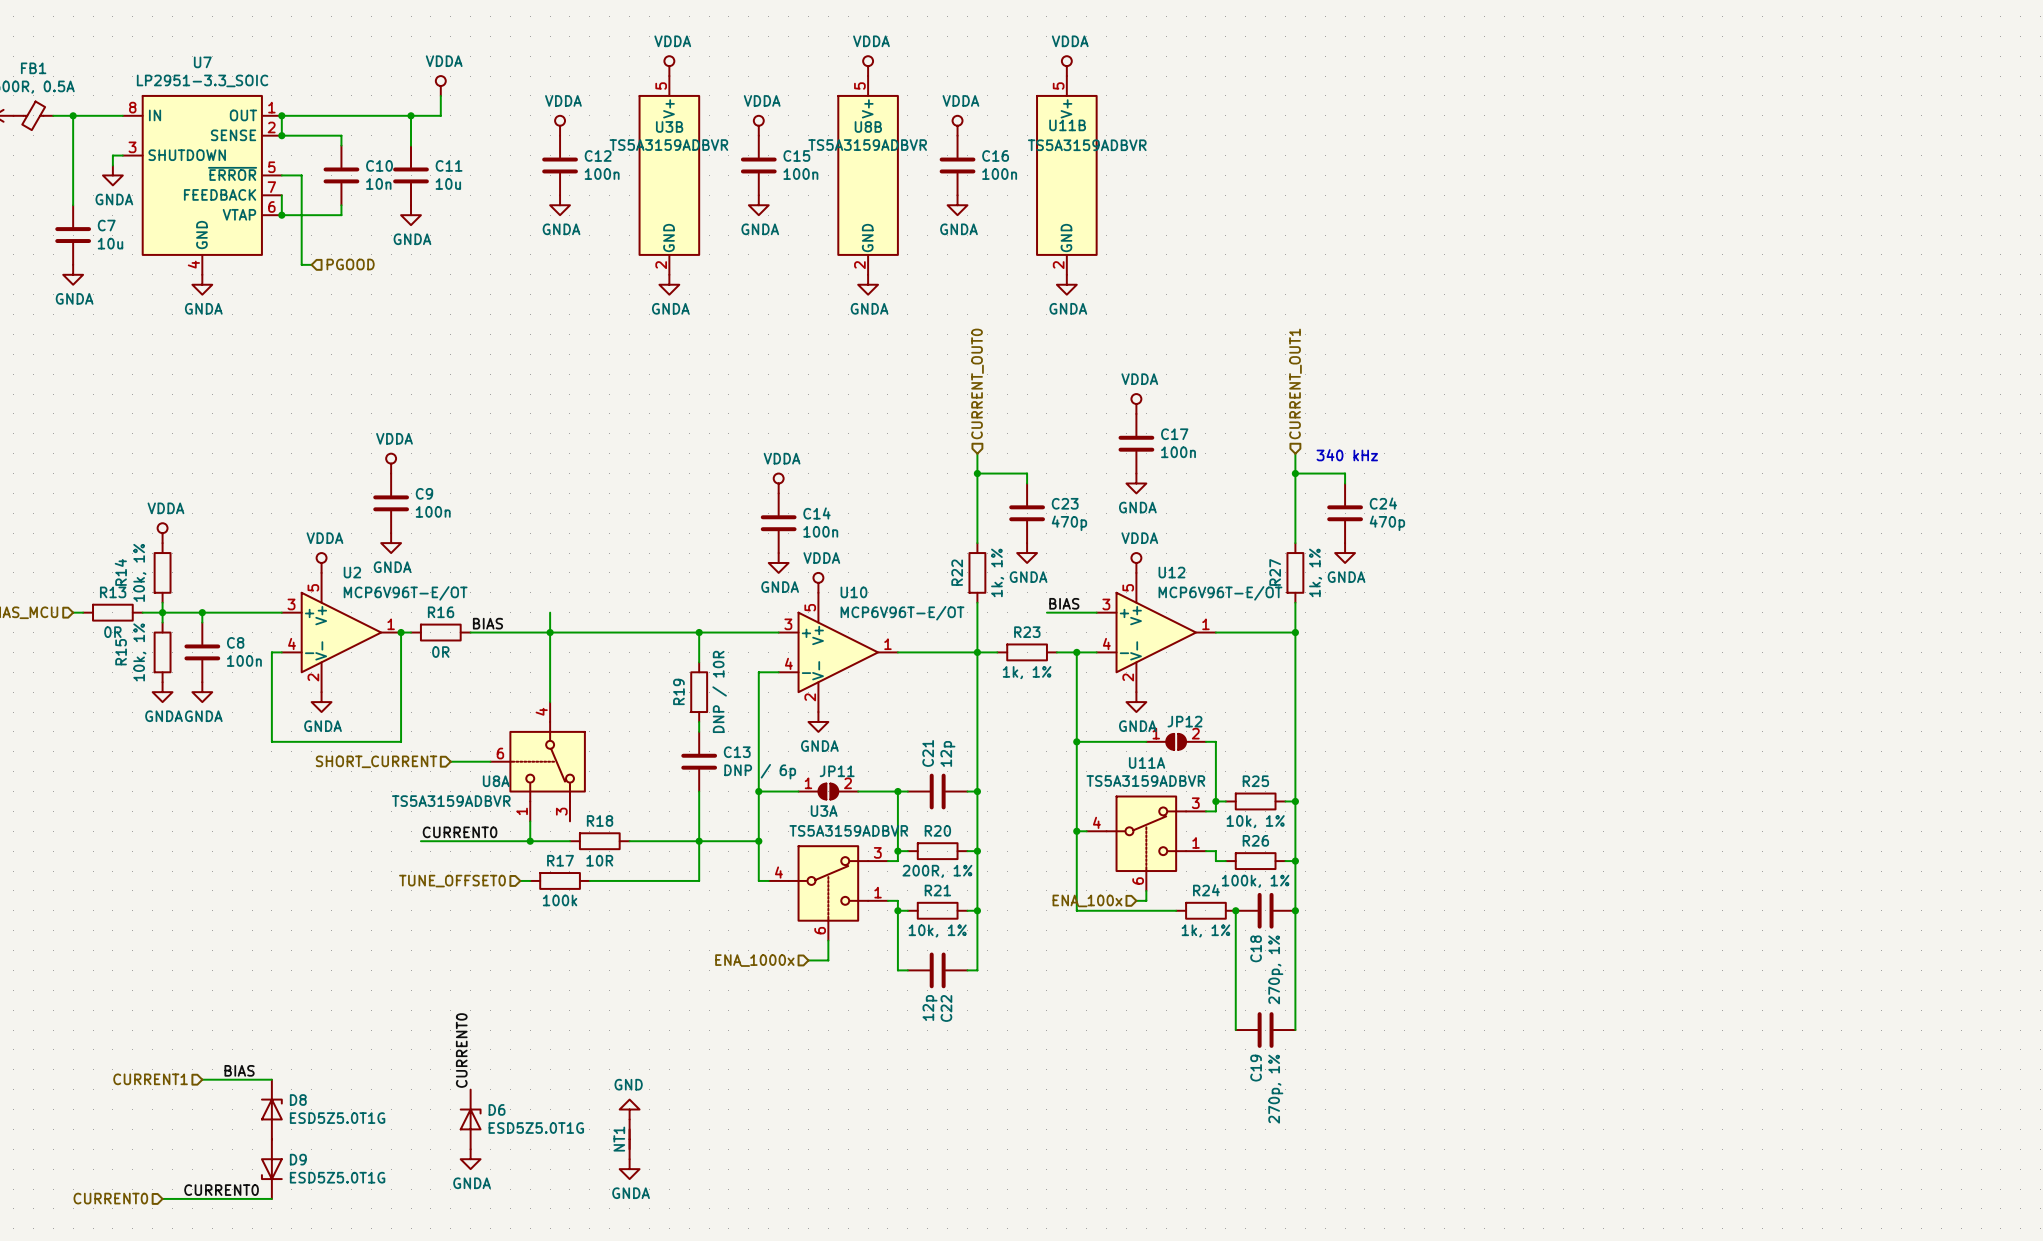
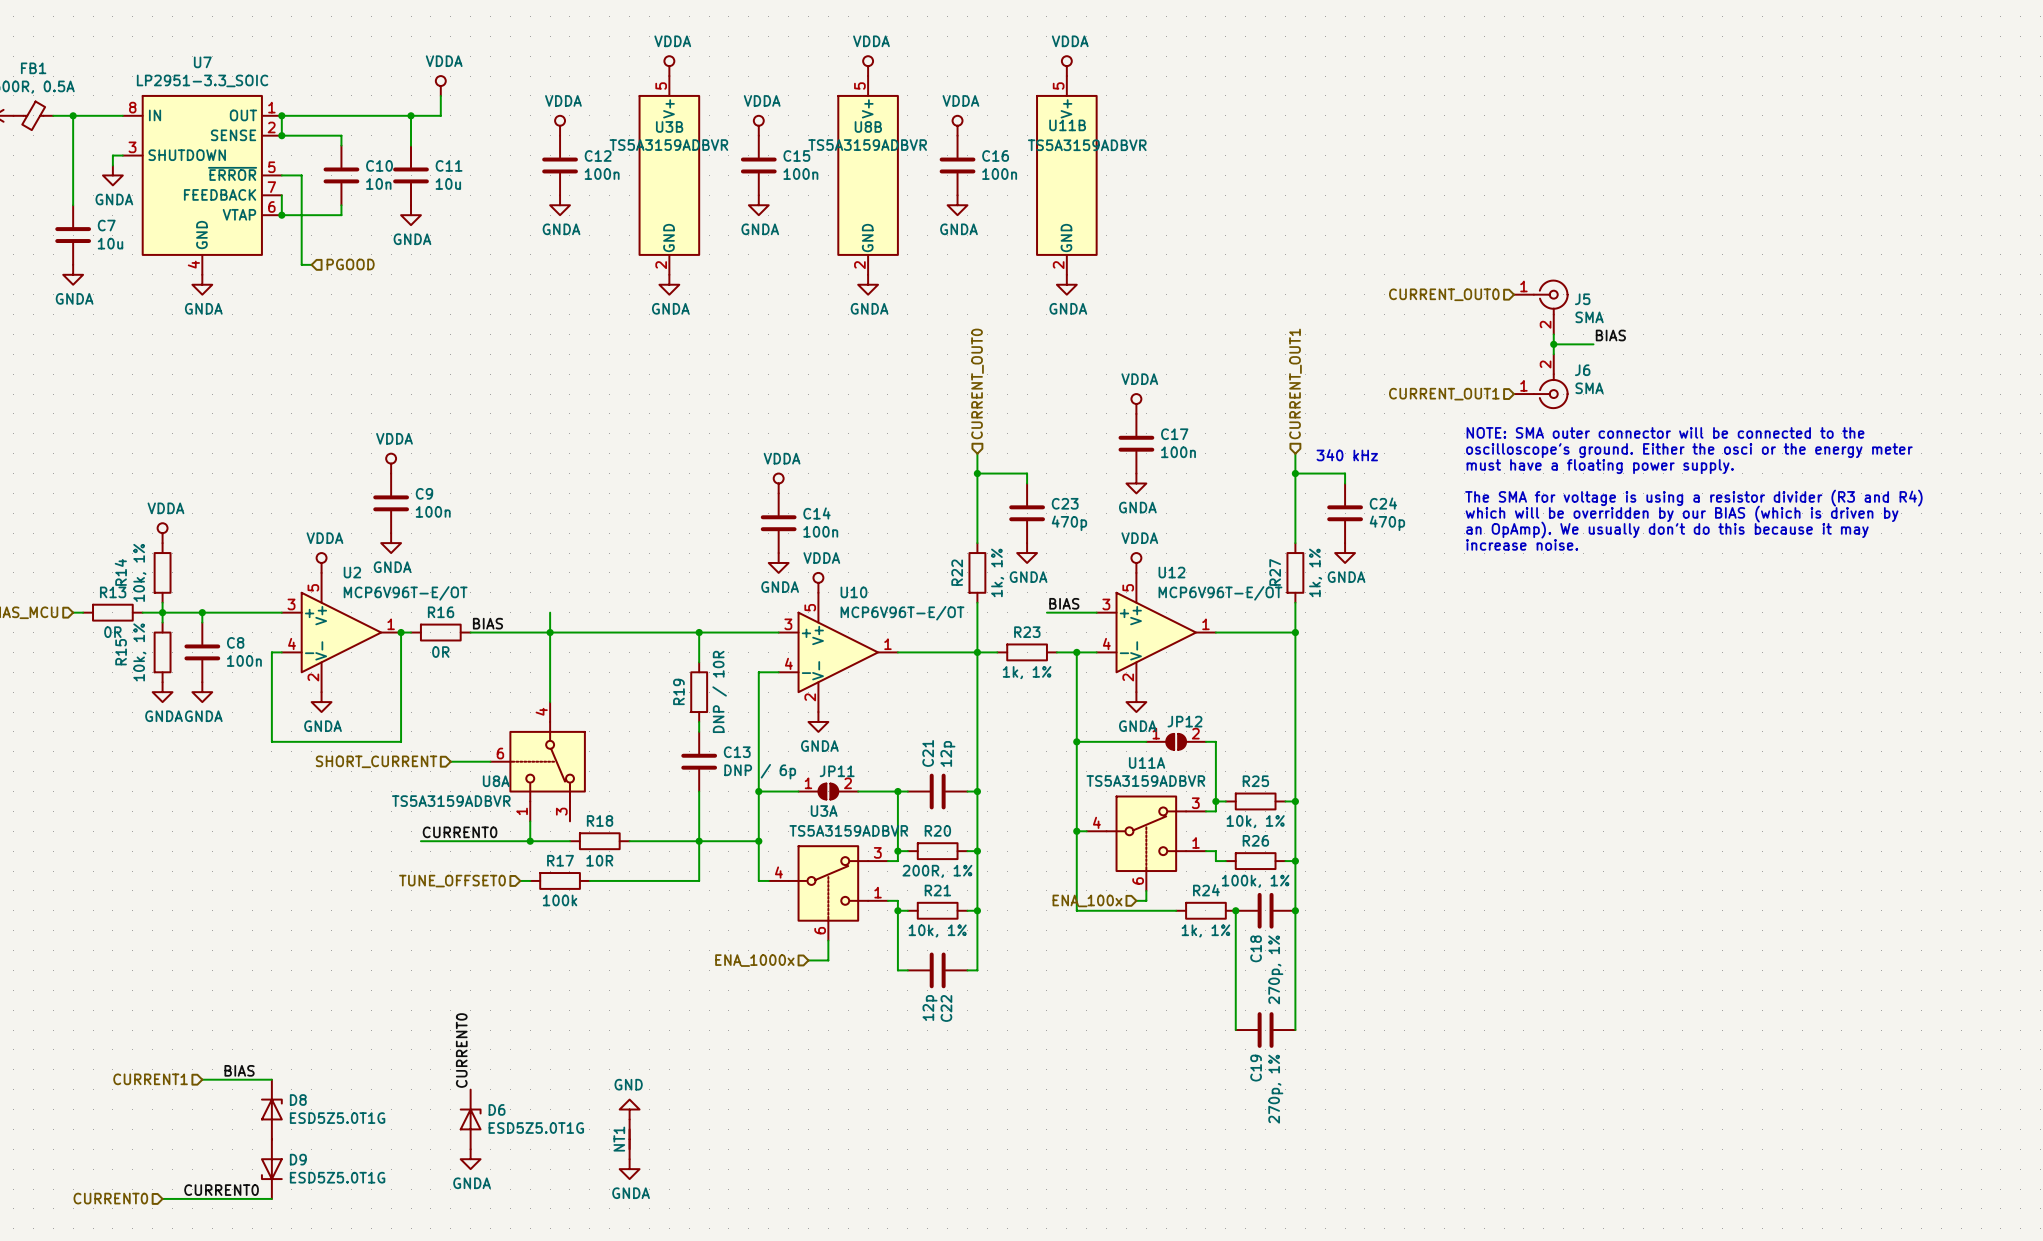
hierarchical label: none -> CURRENT_OUT0 (1444, 294)
J5: none -> SMA (1541, 307)
wire: none -> (1553, 334) (1553, 354)
label: none -> BIAS (1610, 335)
wire: none -> (1553, 344) (1593, 344)
junction: none -> (1553, 344)
J6: none -> SMA (1541, 381)
hierarchical label: none -> CURRENT_OUT1 (1444, 394)
text: none -> NOTE: SMA outer connector will be connected to the (1665, 432)
text: none -> oscilloscope's ground. Either the osci or the energy meter (1689, 450)
text: none -> must have a floating power supply. (1600, 466)
text: none -> The SMA for voltage is using a resistor divider (R3 and R4) (1693, 498)
text: none -> which will be overridden by our BIAS (which is driven by (1682, 514)
text: none -> an OpAmp). We usually don't do this because it may (1667, 530)
text: none -> increase noise. (1522, 544)

